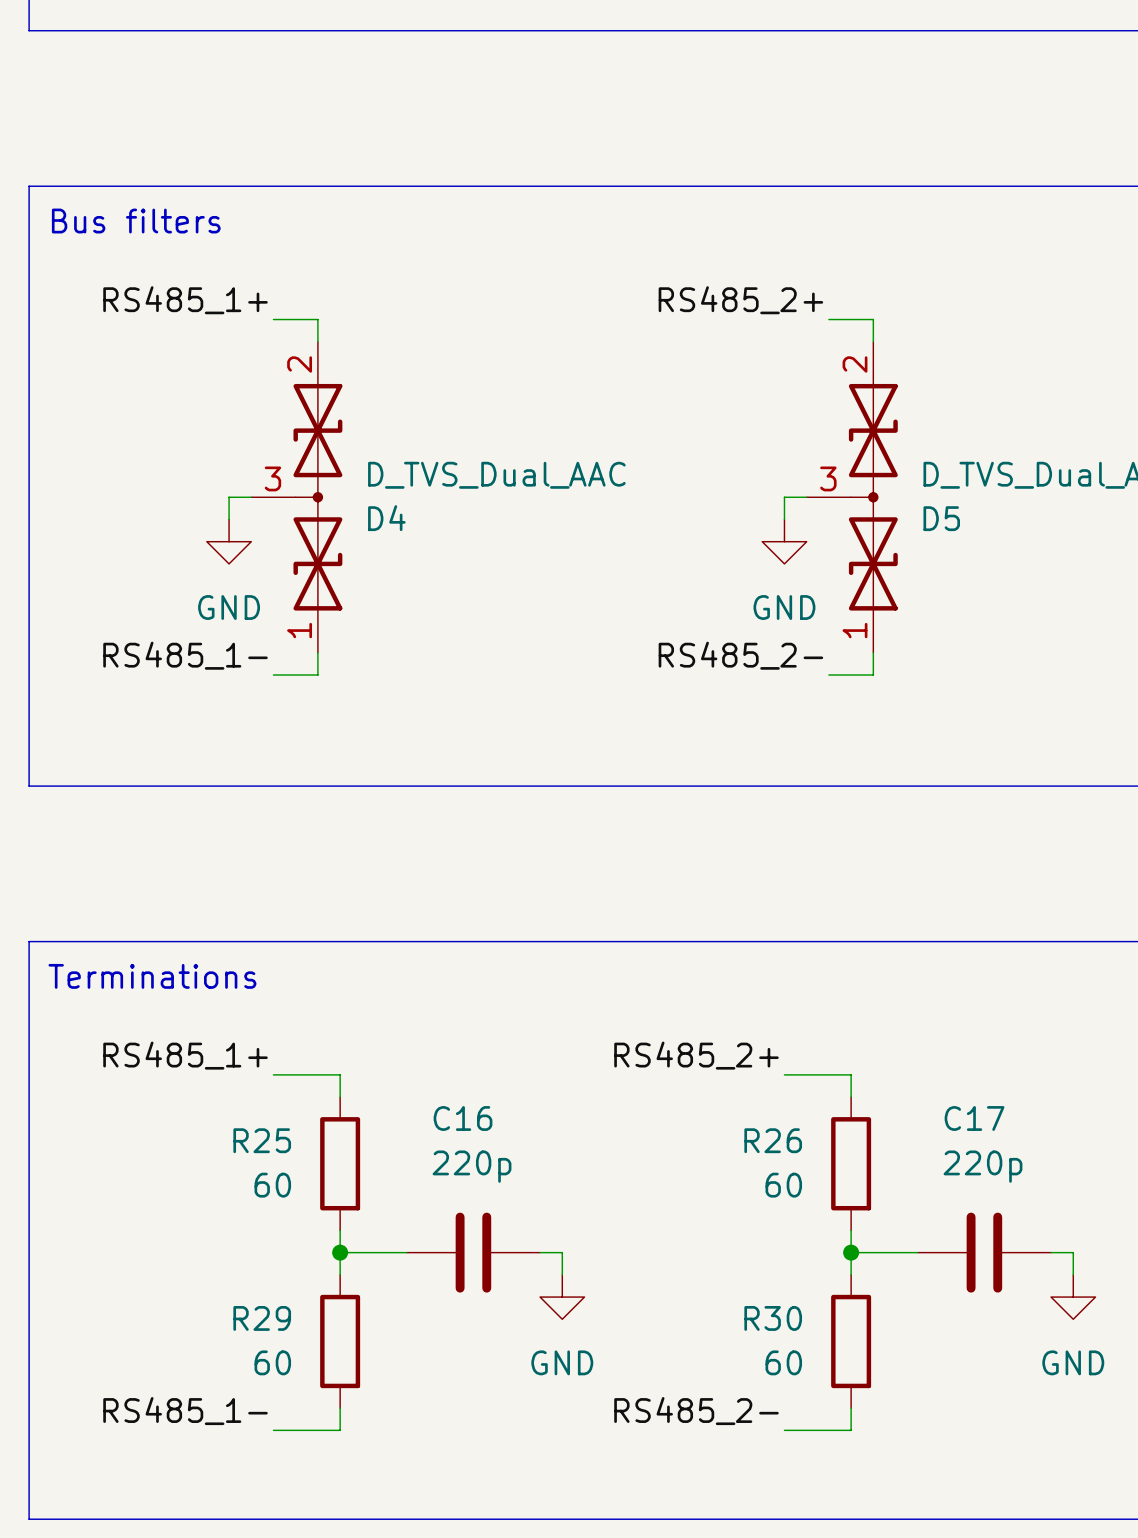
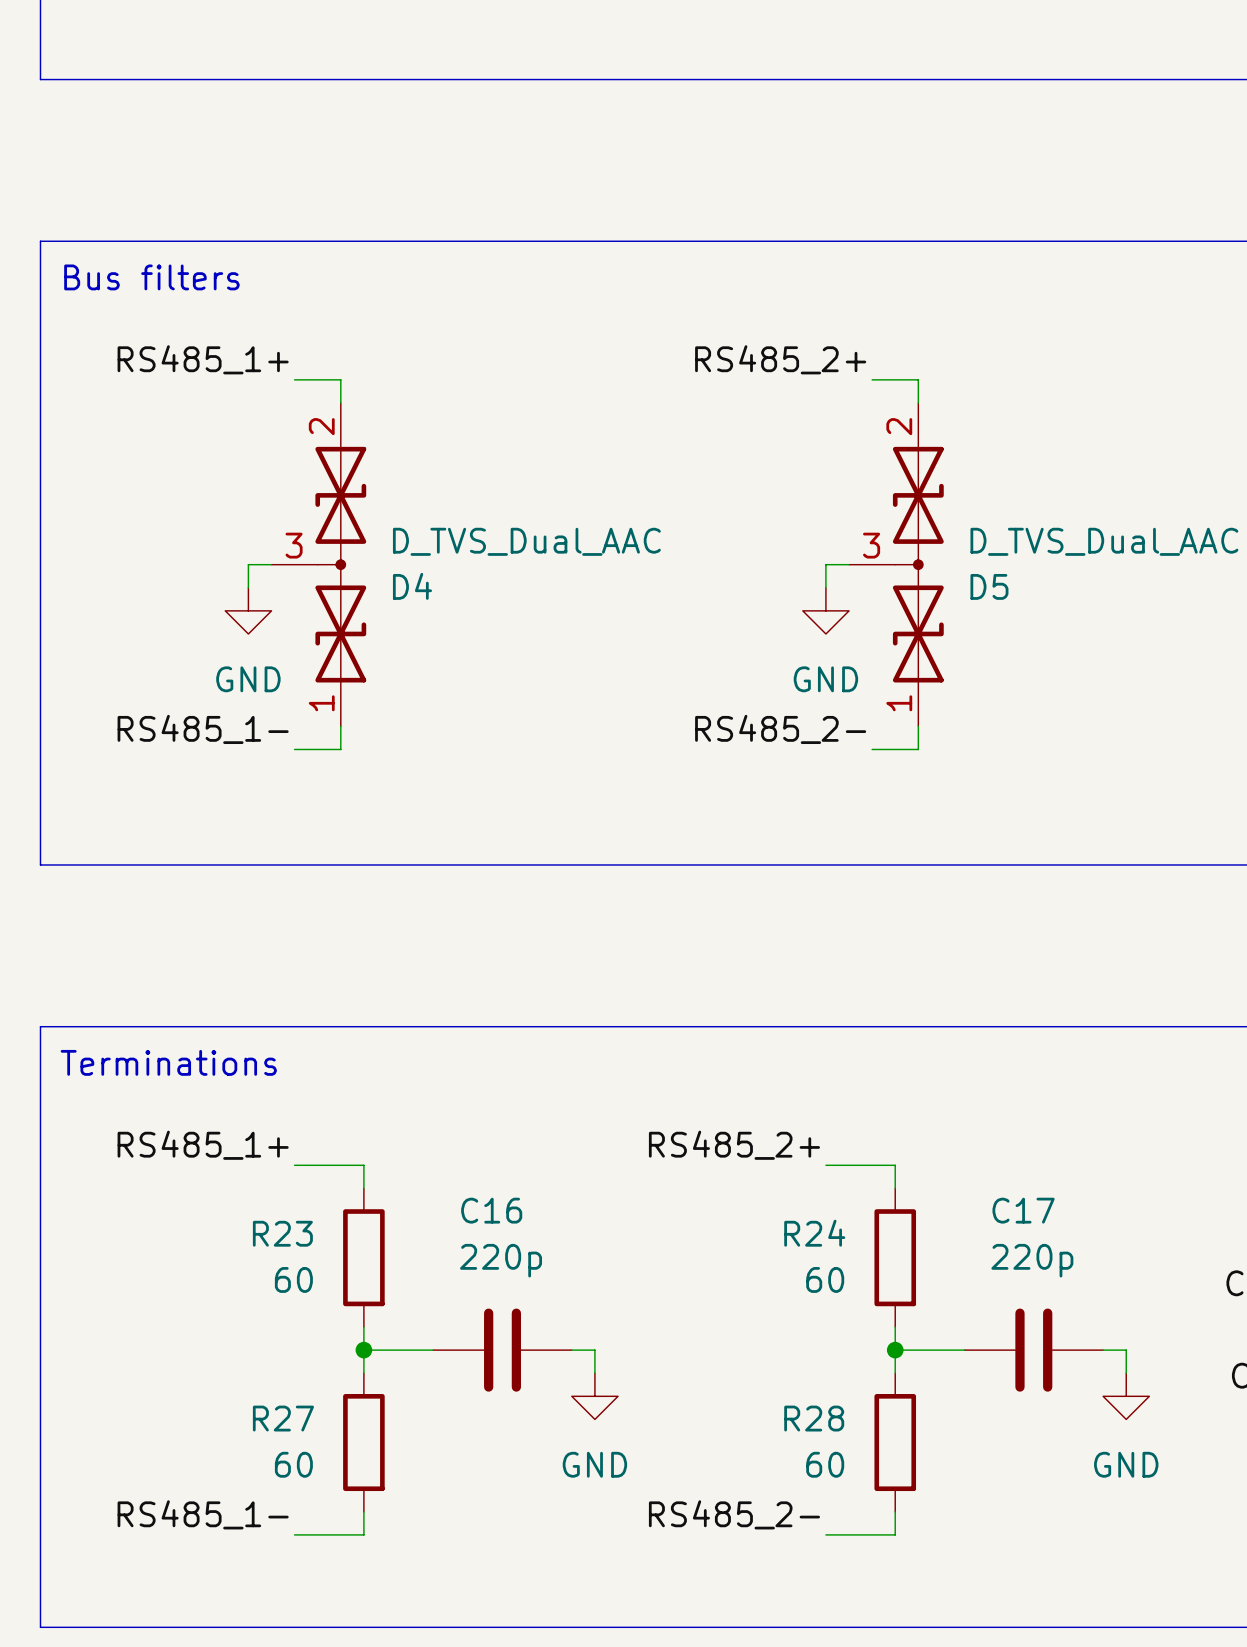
R25 name: R25 (262, 1140) -> R23 (282, 1233)
R26 name: R26 (773, 1140) -> R24 (814, 1233)
R29 name: R29 (262, 1318) -> R27 (283, 1418)
R30 name: R30 (773, 1318) -> R28 (814, 1418)

